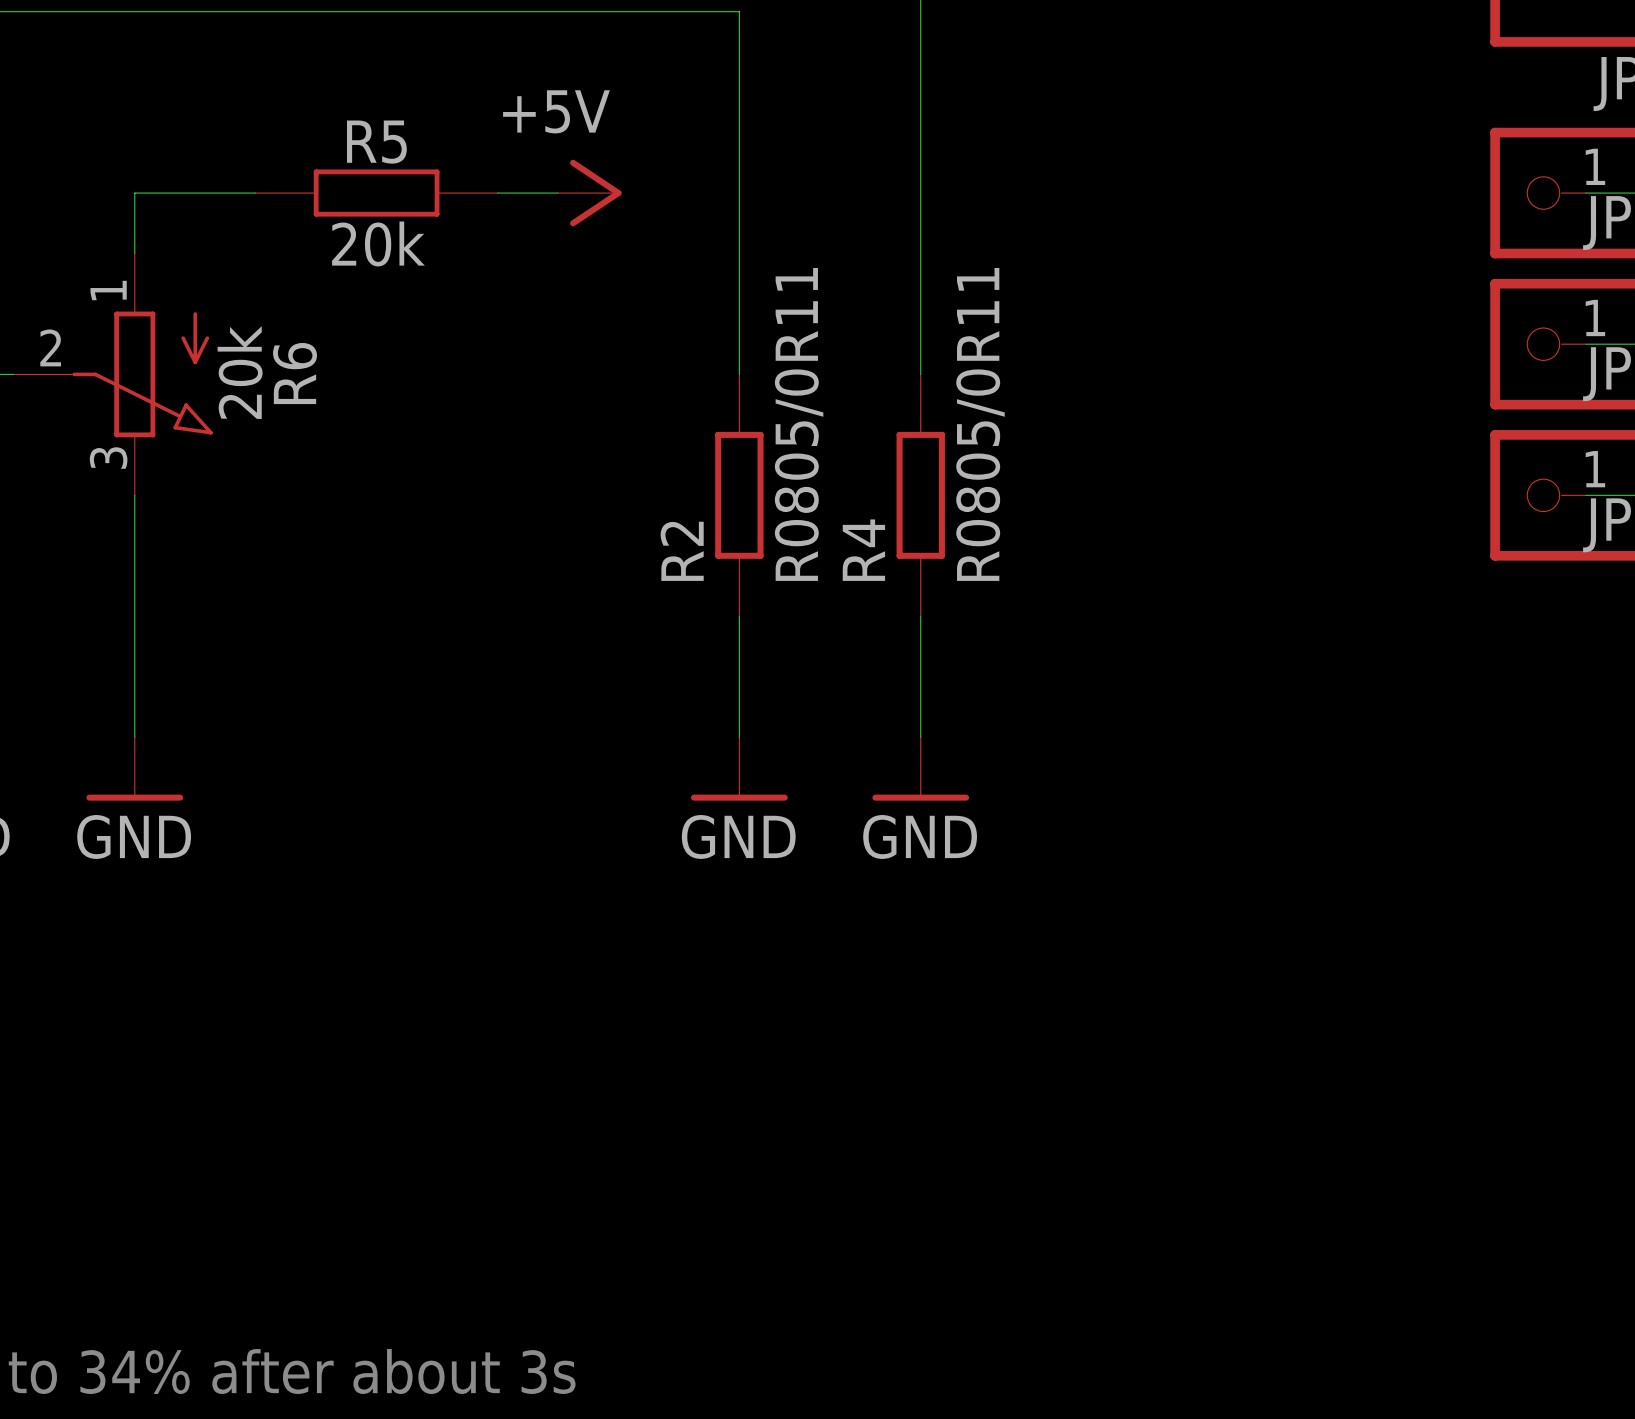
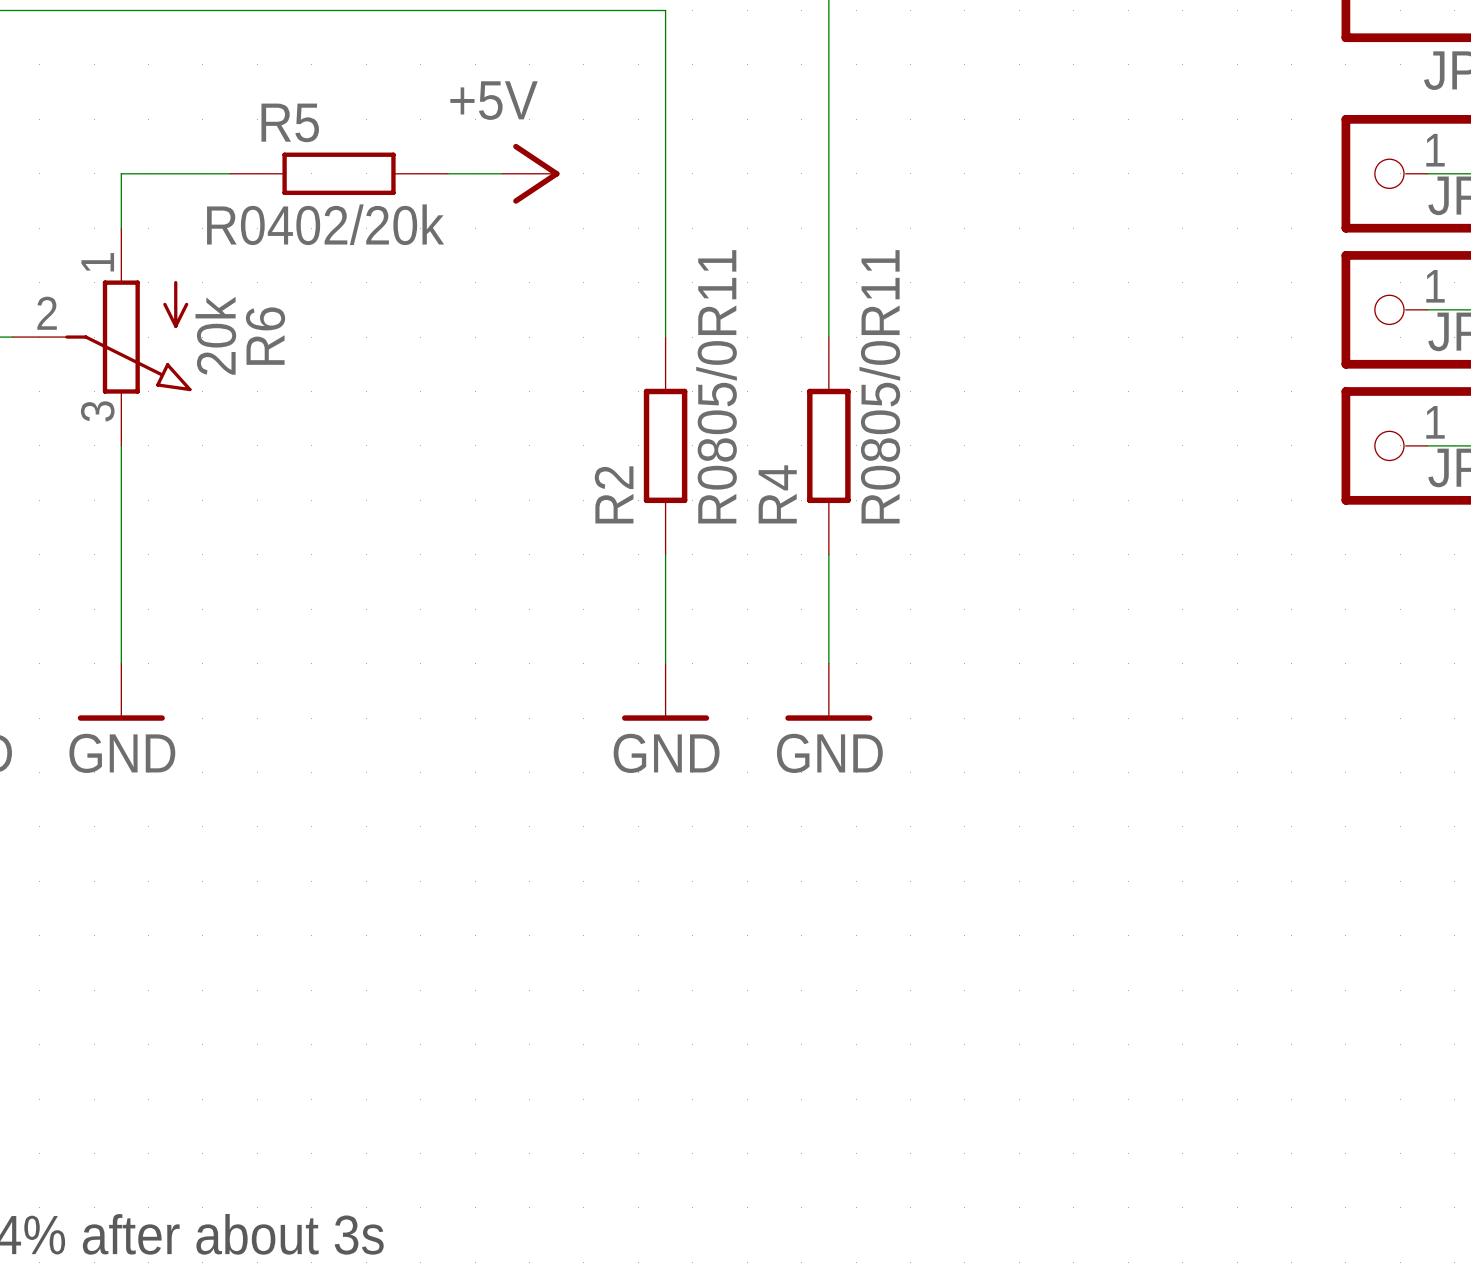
R5 name position: R5 (376, 142) -> R5 (290, 122)
R5 value: 20k (378, 243) -> R0402/20k (325, 224)

